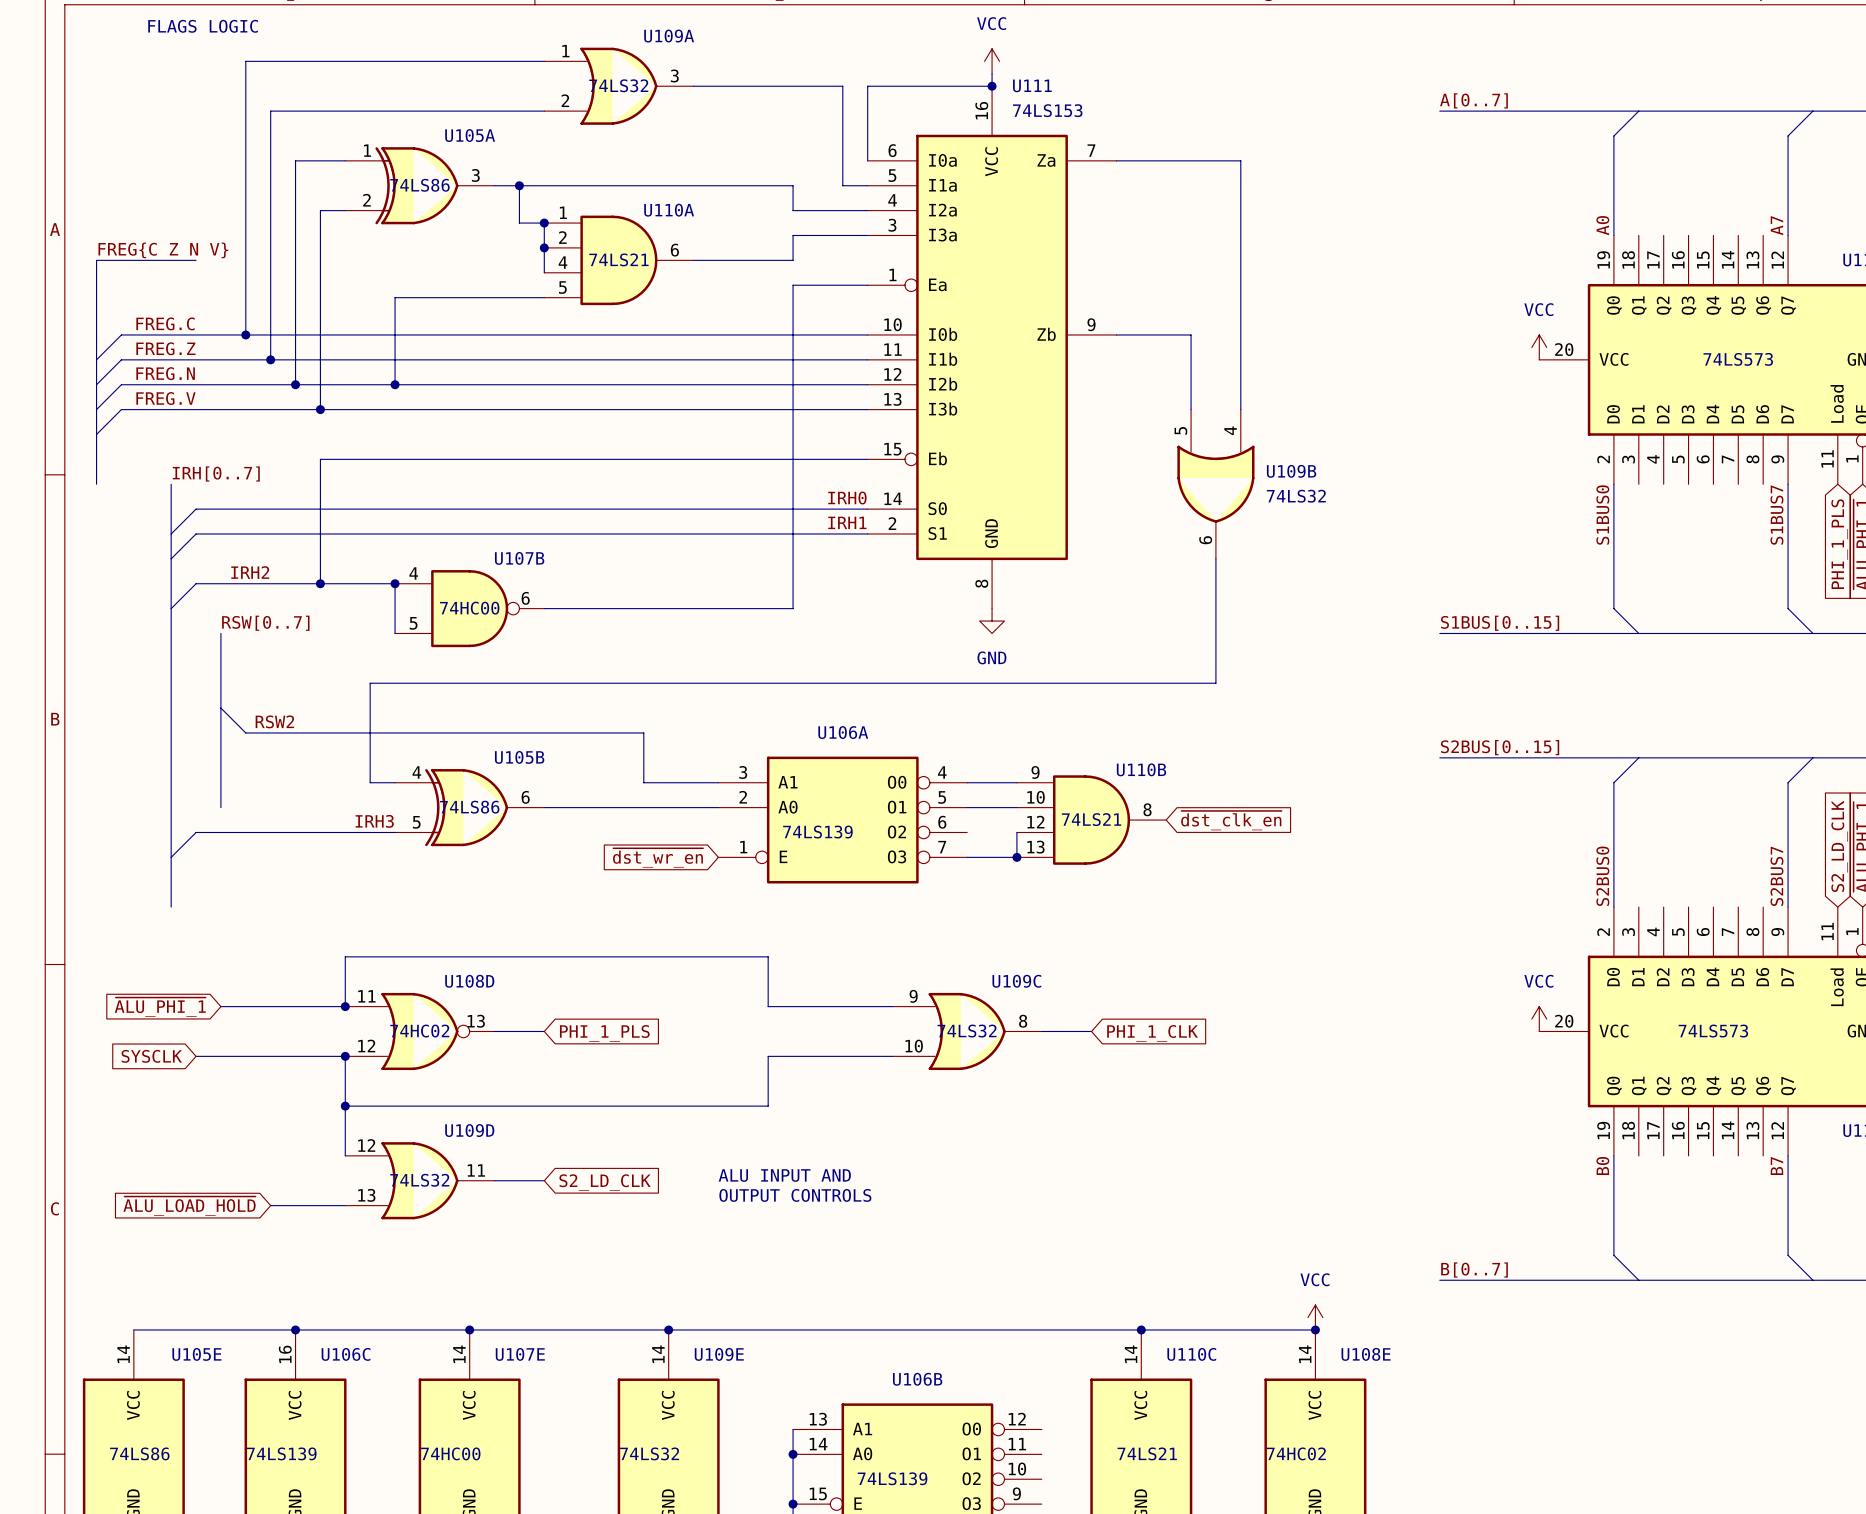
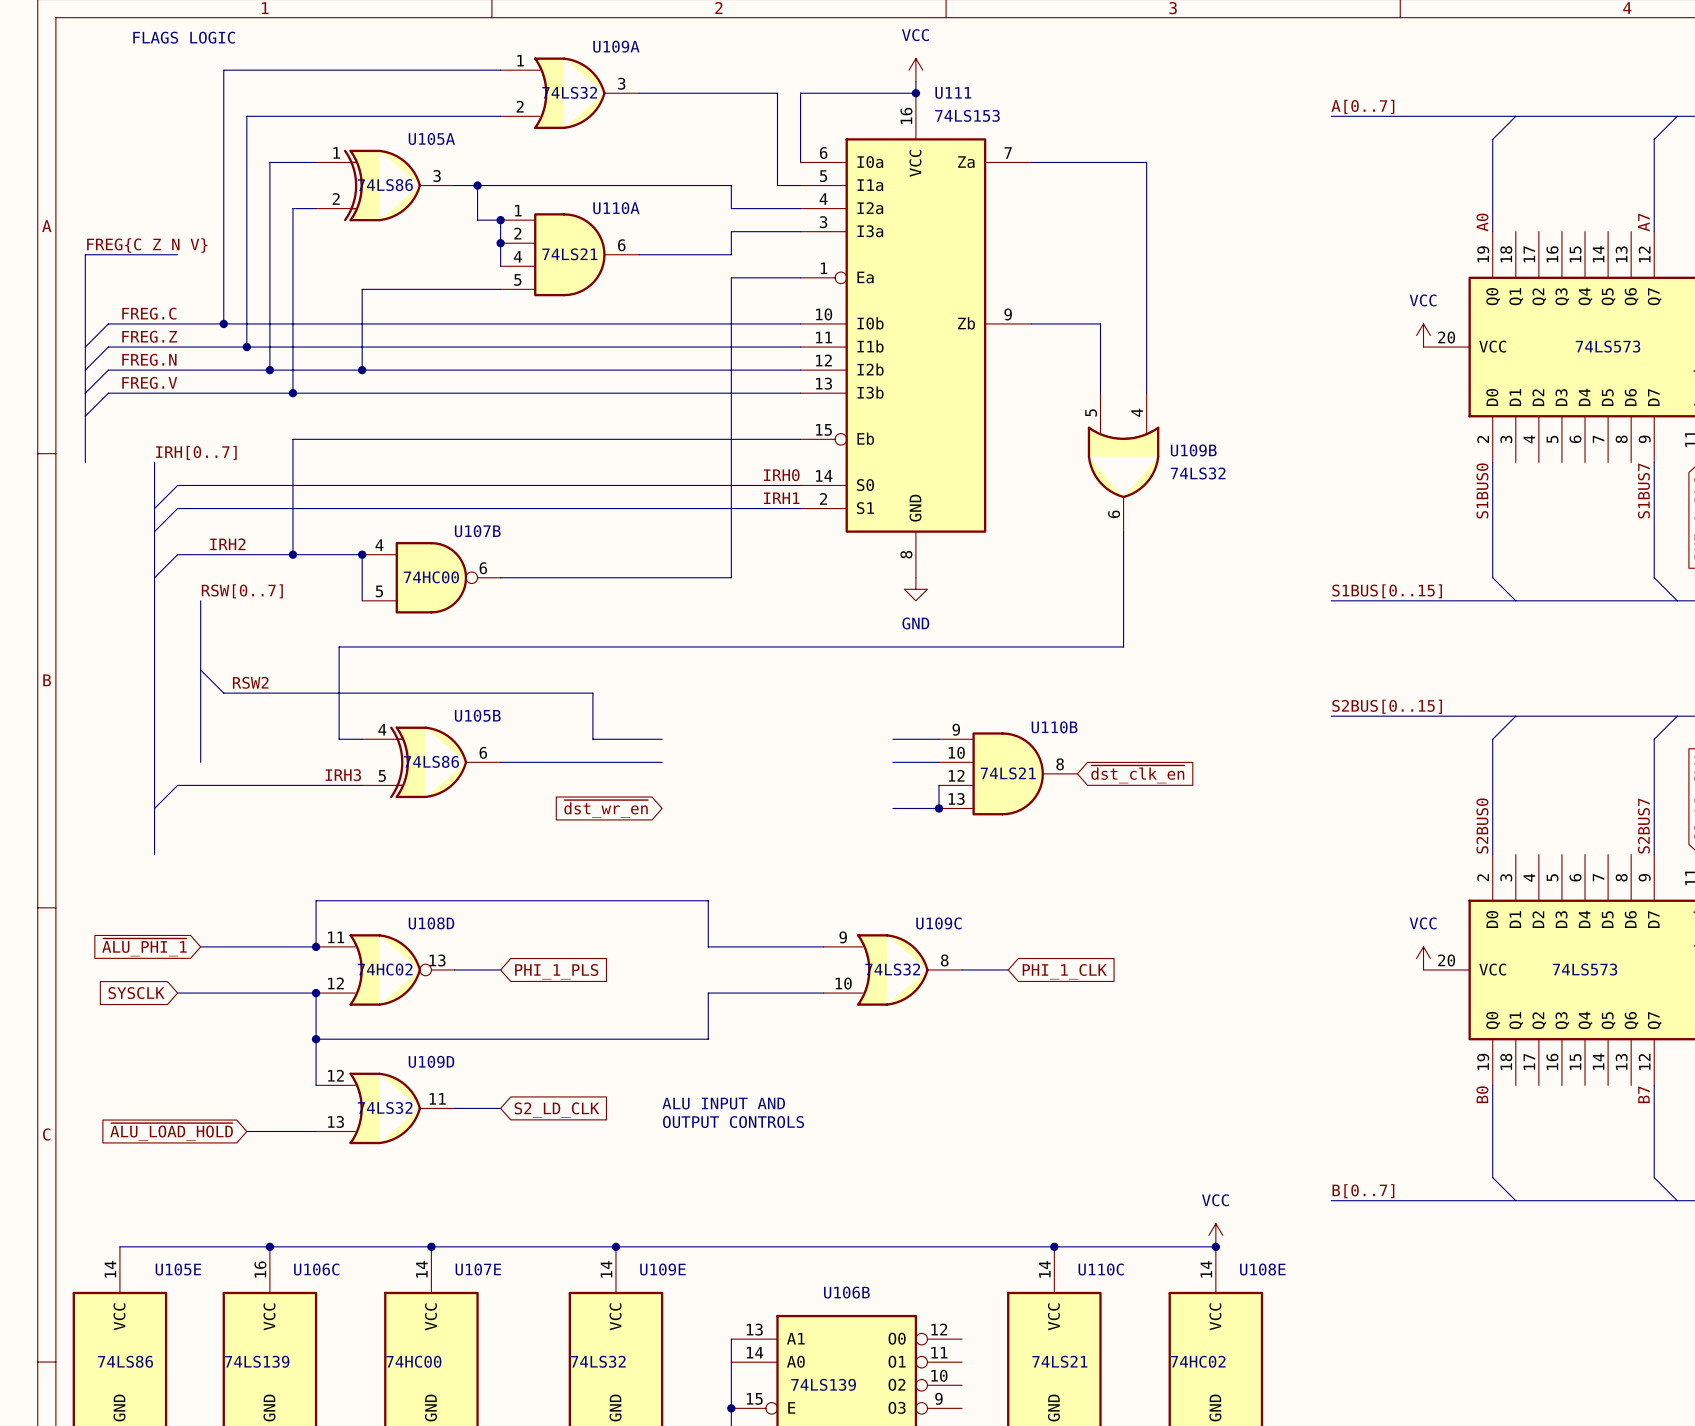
U106A: 74LS139 (842, 820) -> none
junction: (793, 1454) -> none

